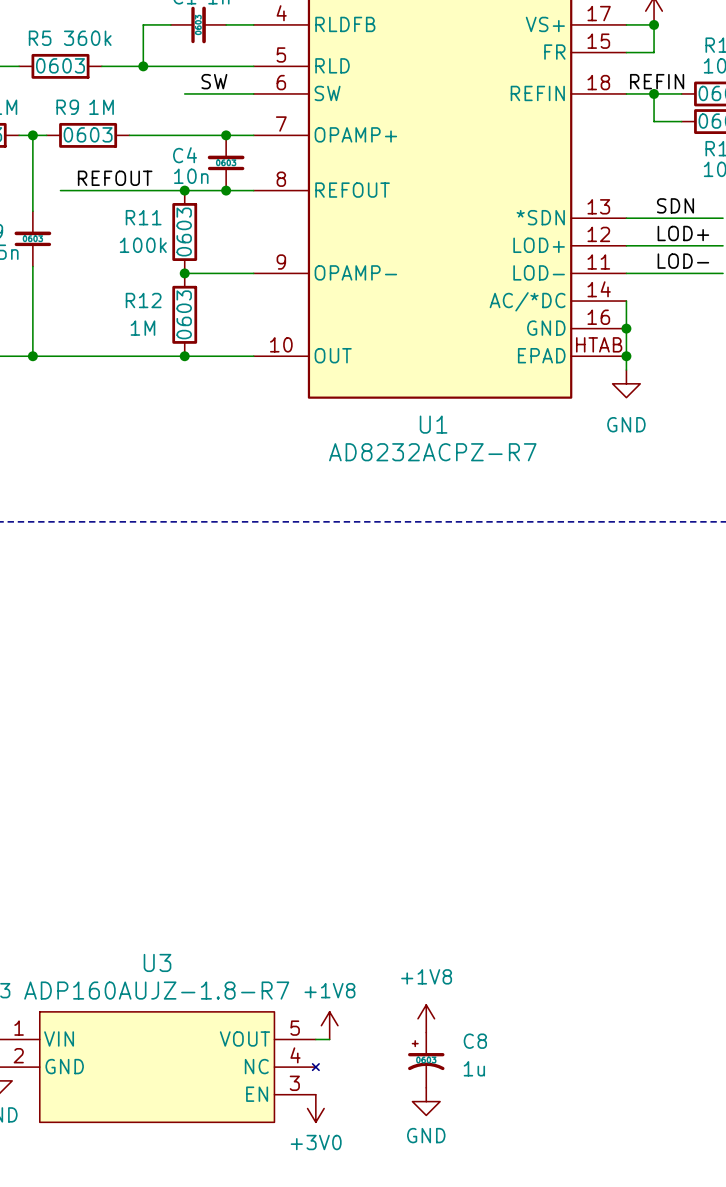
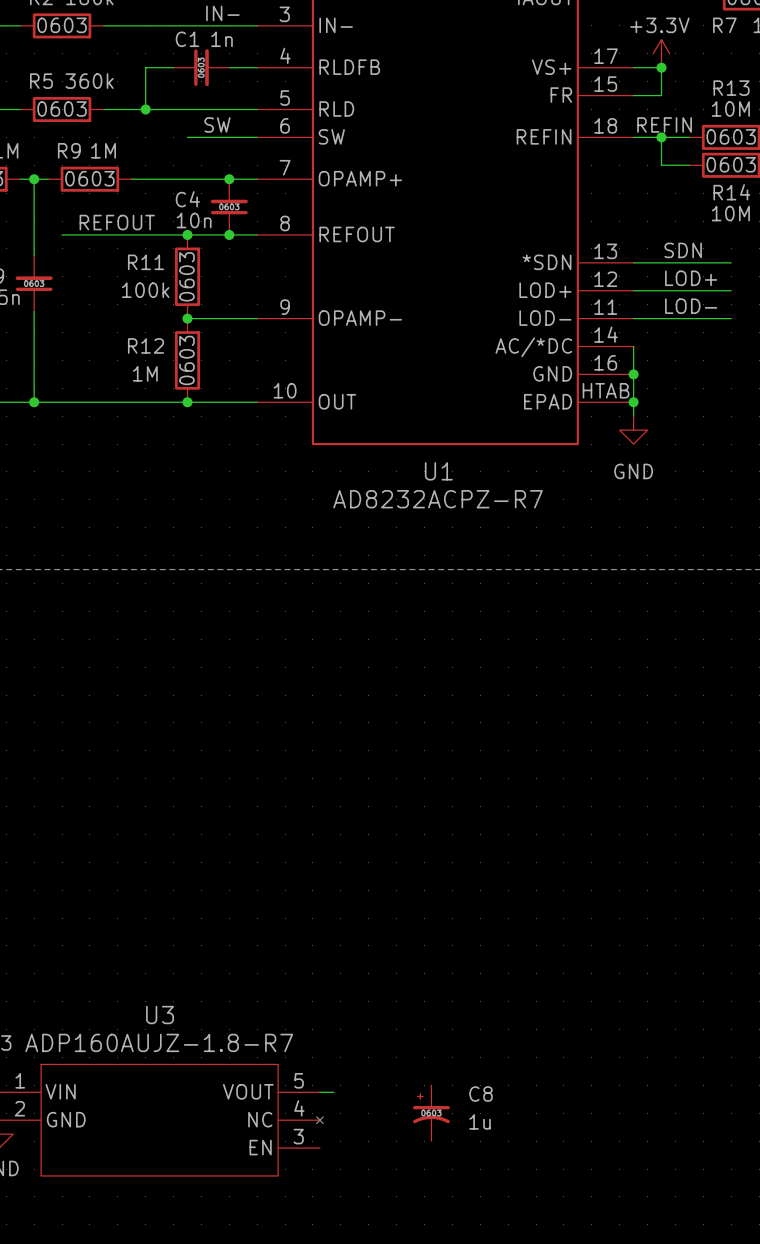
power symbol: +1V8 (426, 1018) -> none
power symbol: +1V8 (329, 1025) -> none
power symbol: GND (426, 1101) -> none
power symbol: +3V0 (315, 1108) -> none

